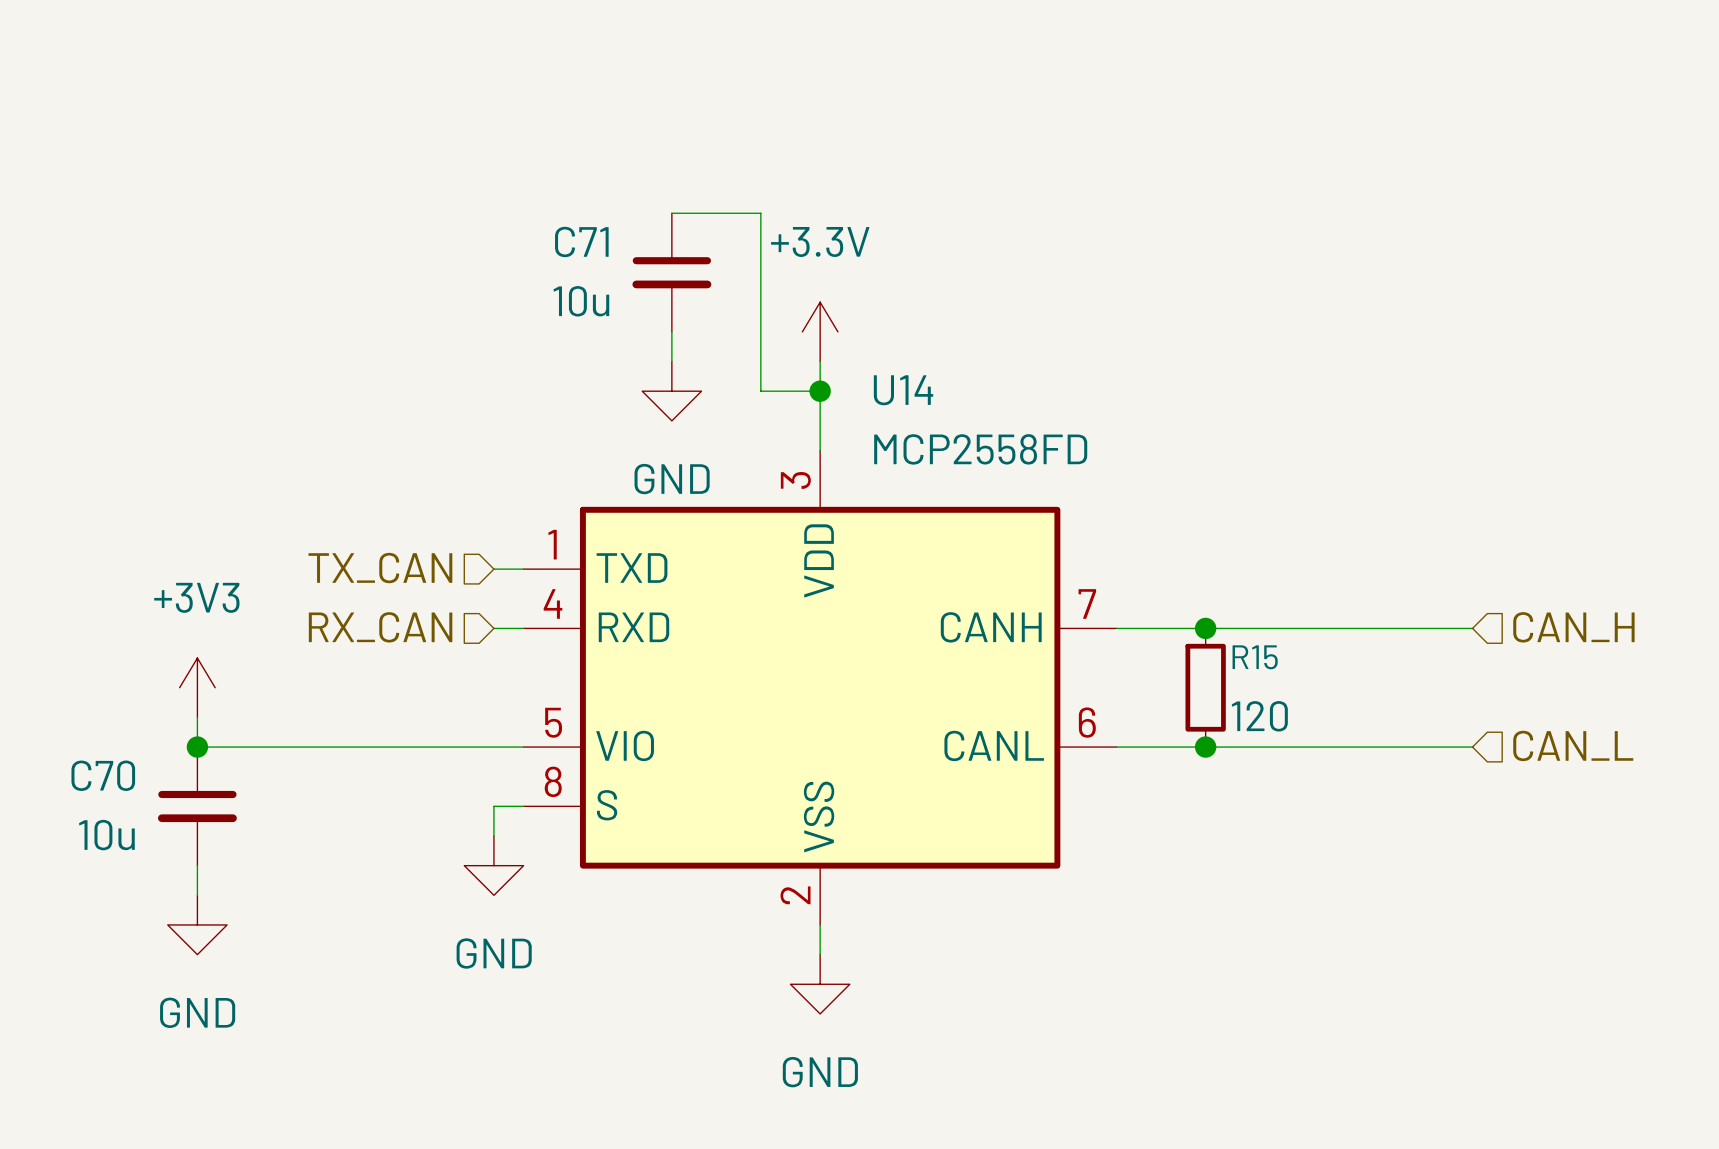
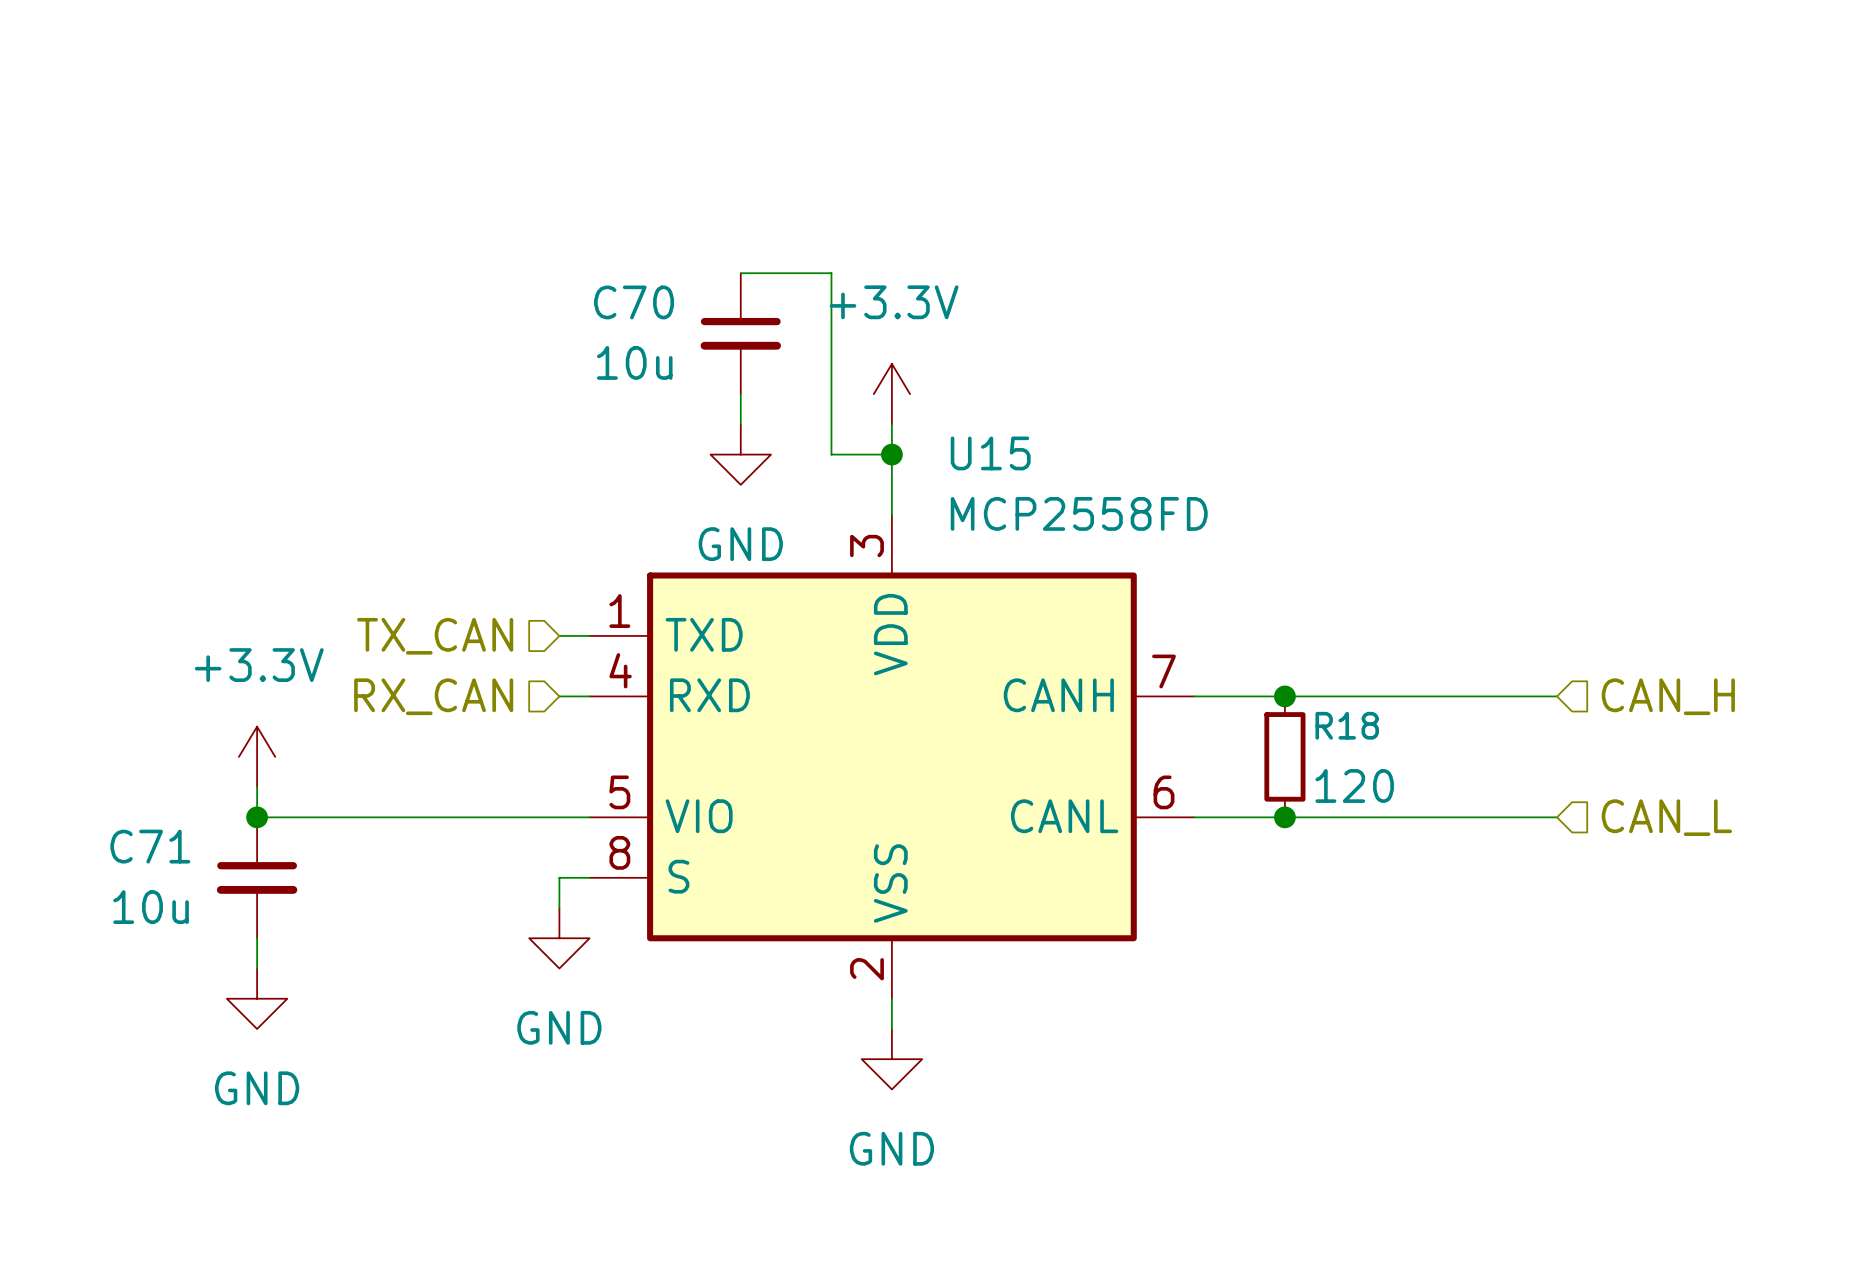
C71 name: C71 (581, 241) -> C70 (634, 302)
U14 name: U14 (903, 390) -> U15 (990, 453)
R15 name: R15 (1255, 657) -> R18 (1347, 725)
power symbol: +3V3 (197, 687) -> +3.3V (257, 756)
C70 name: C70 (103, 775) -> C71 (150, 846)

